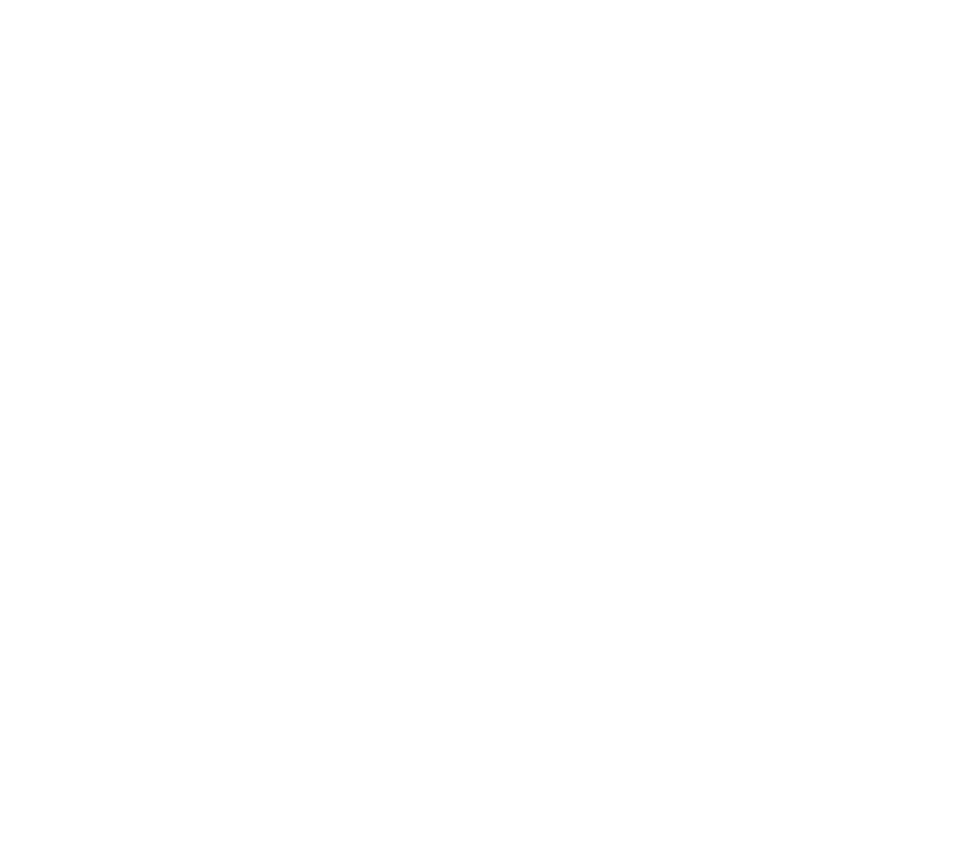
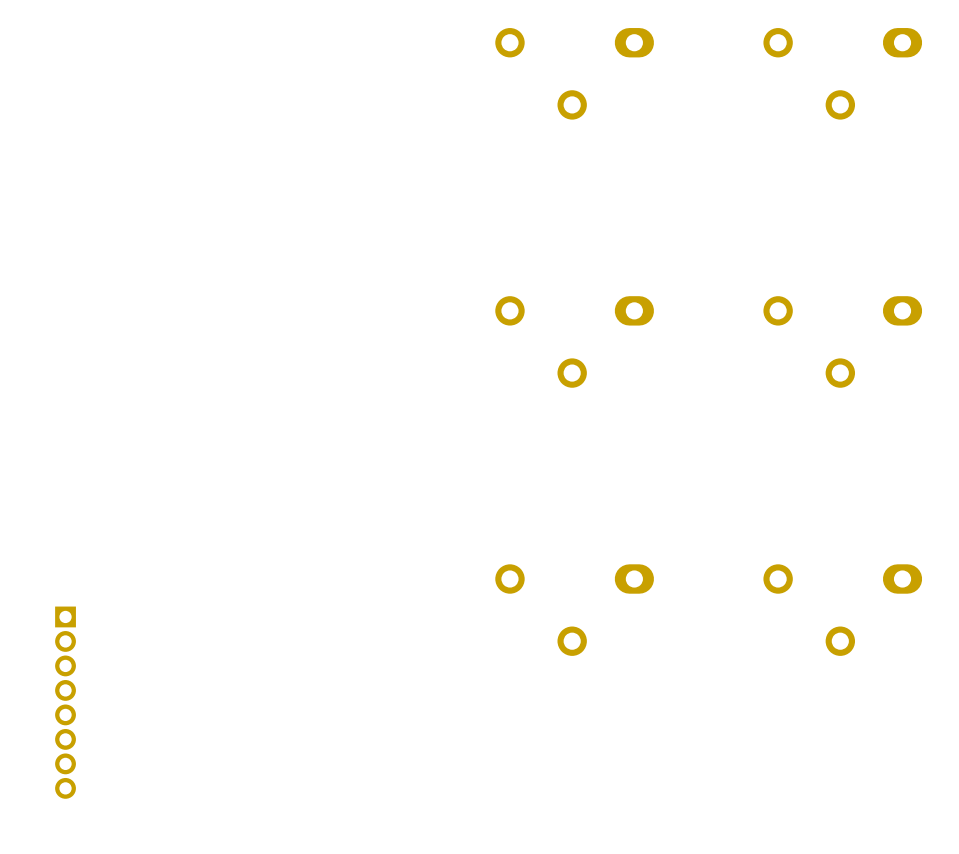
part: none -> (574, 73)
part: none -> (842, 73)
part: none -> (574, 341)
part: none -> (842, 341)
part: none -> (574, 610)
part: none -> (842, 610)
part: none -> (65, 702)

